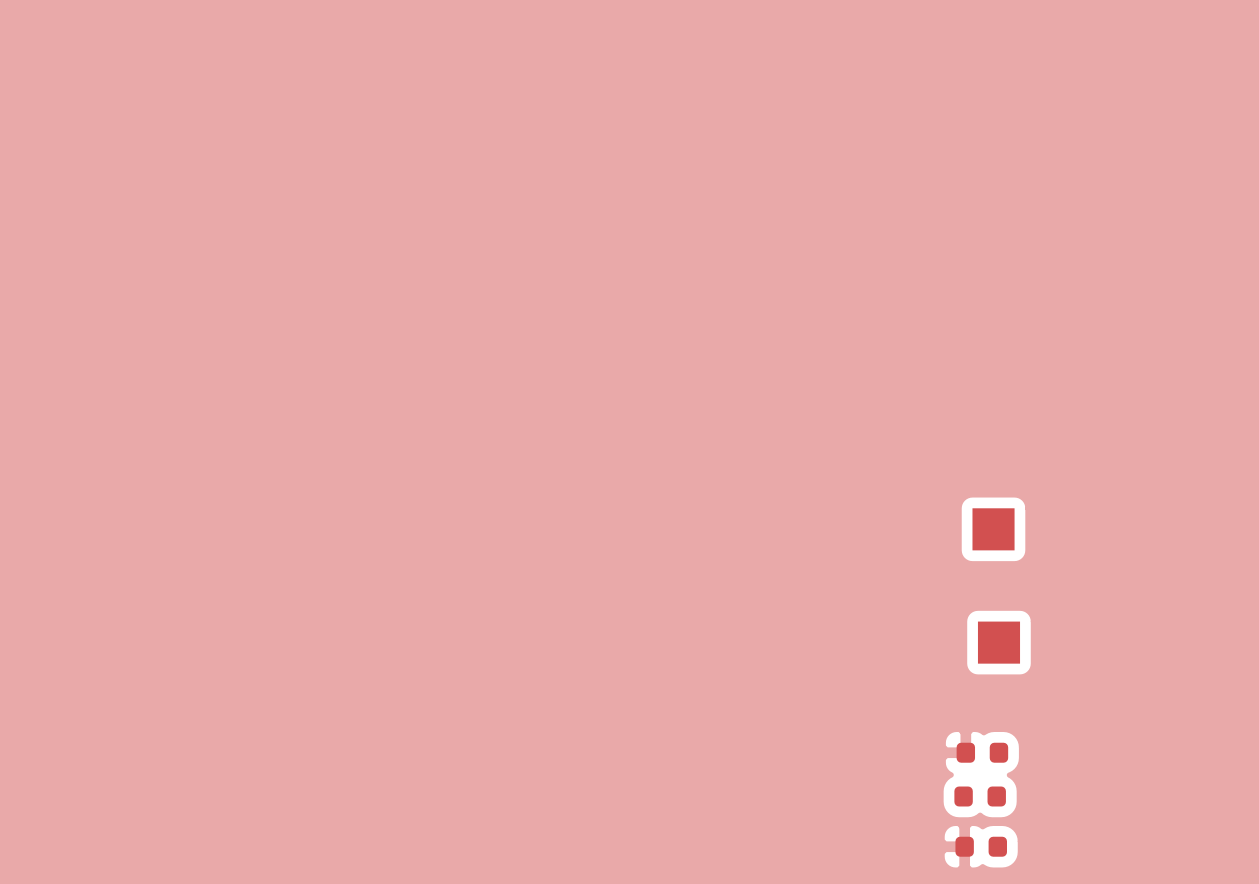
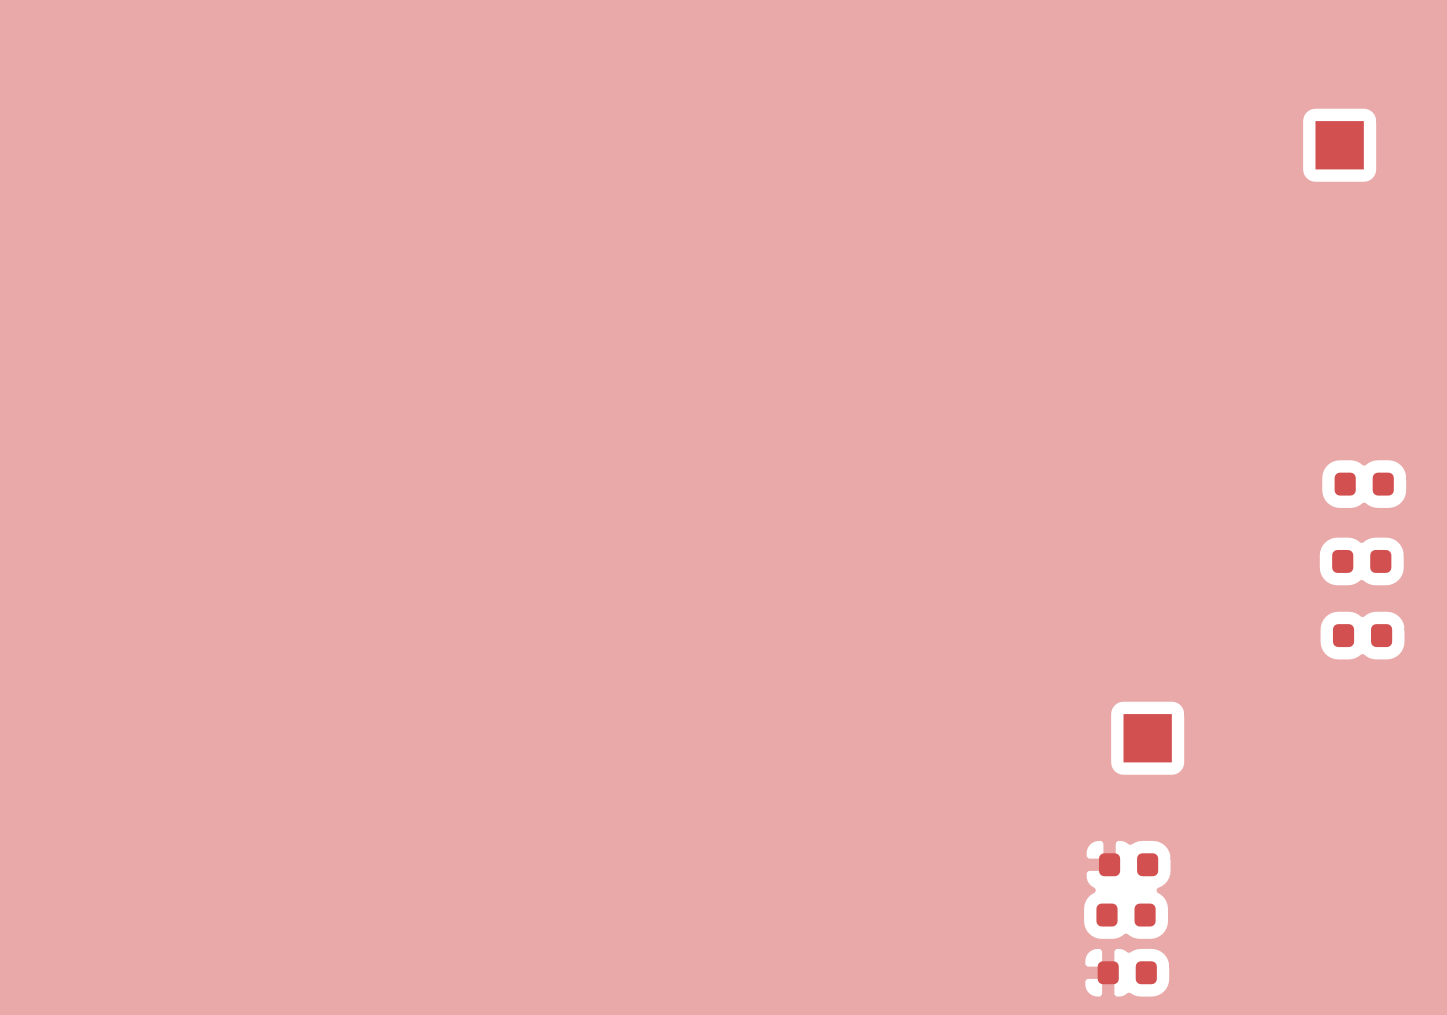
part: none -> (1364, 484)
part: none -> (1361, 561)
part position: (993, 529) -> (1339, 145)
part: none -> (1362, 635)

